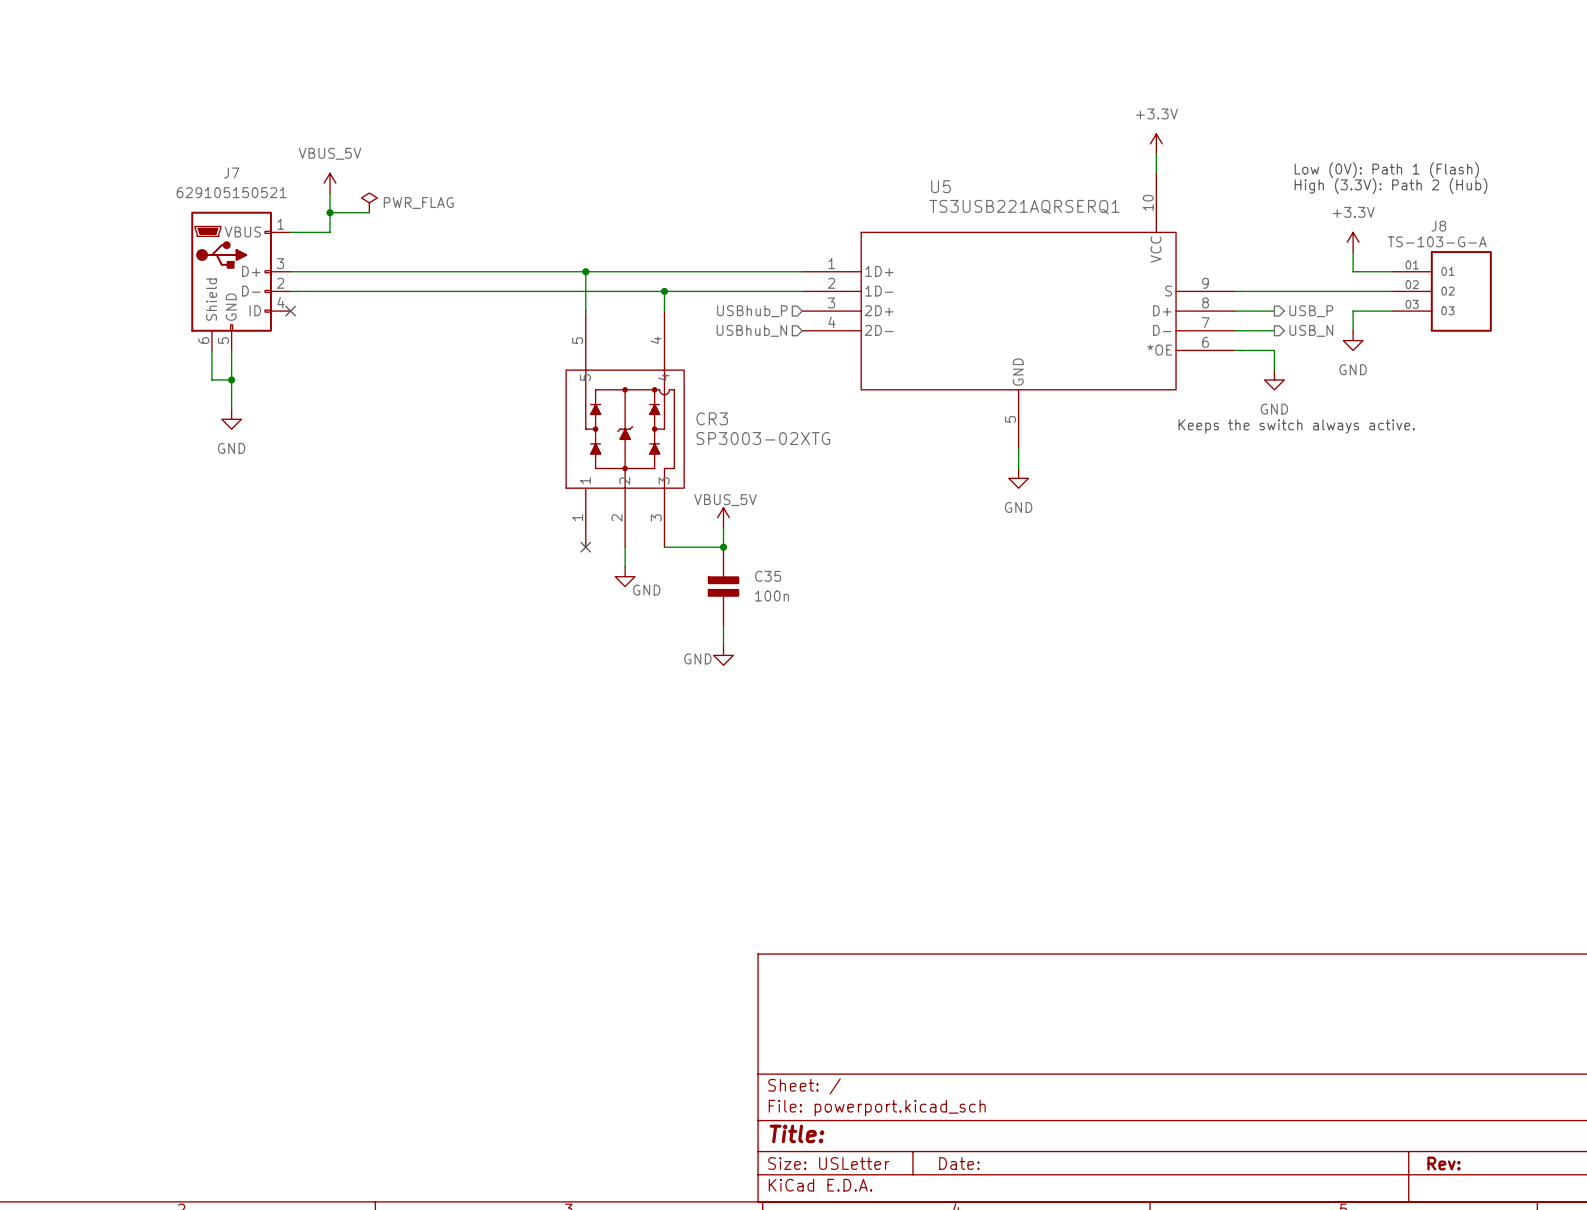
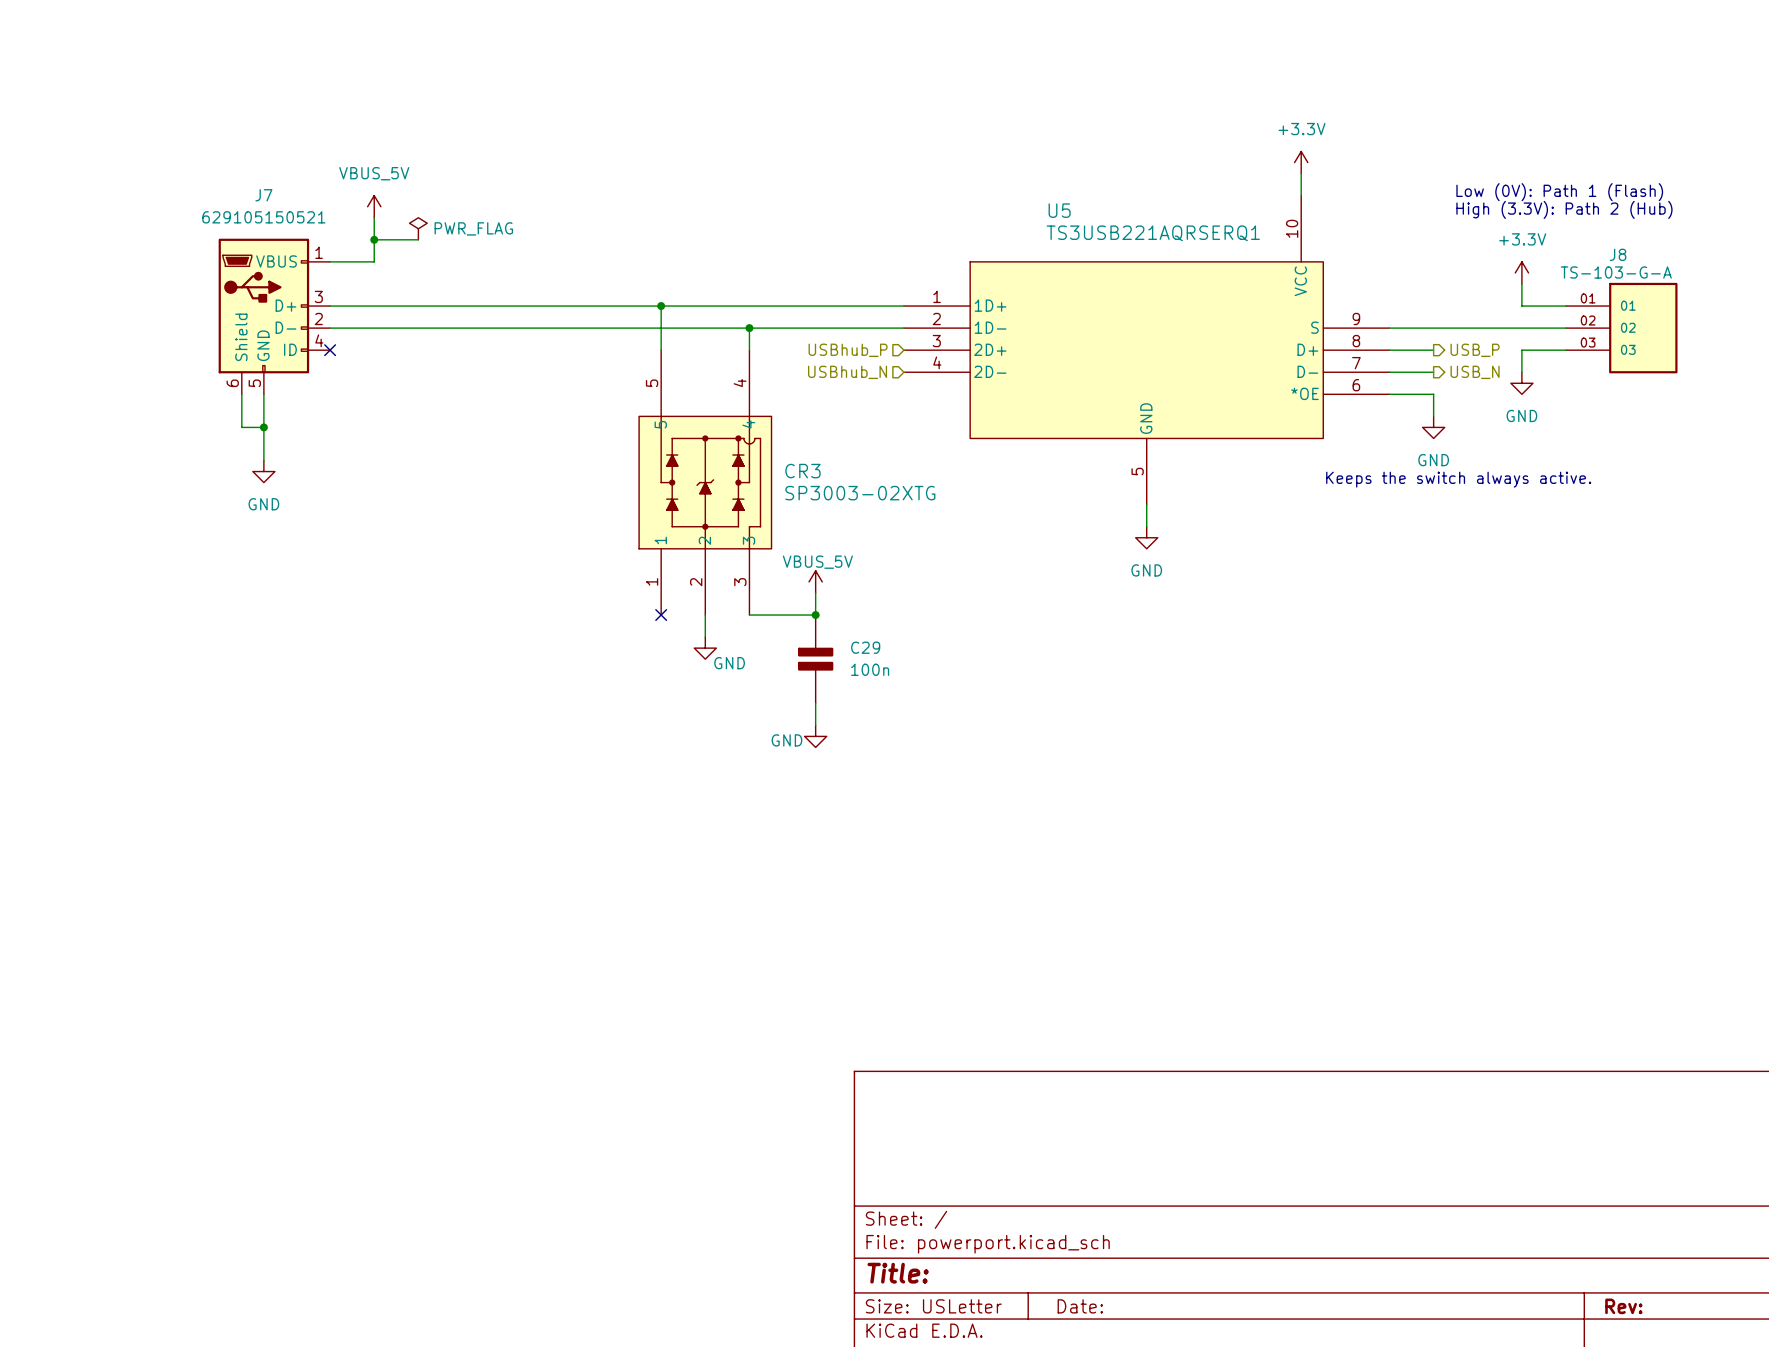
C35 name: C35 (768, 576) -> C29 (865, 647)

